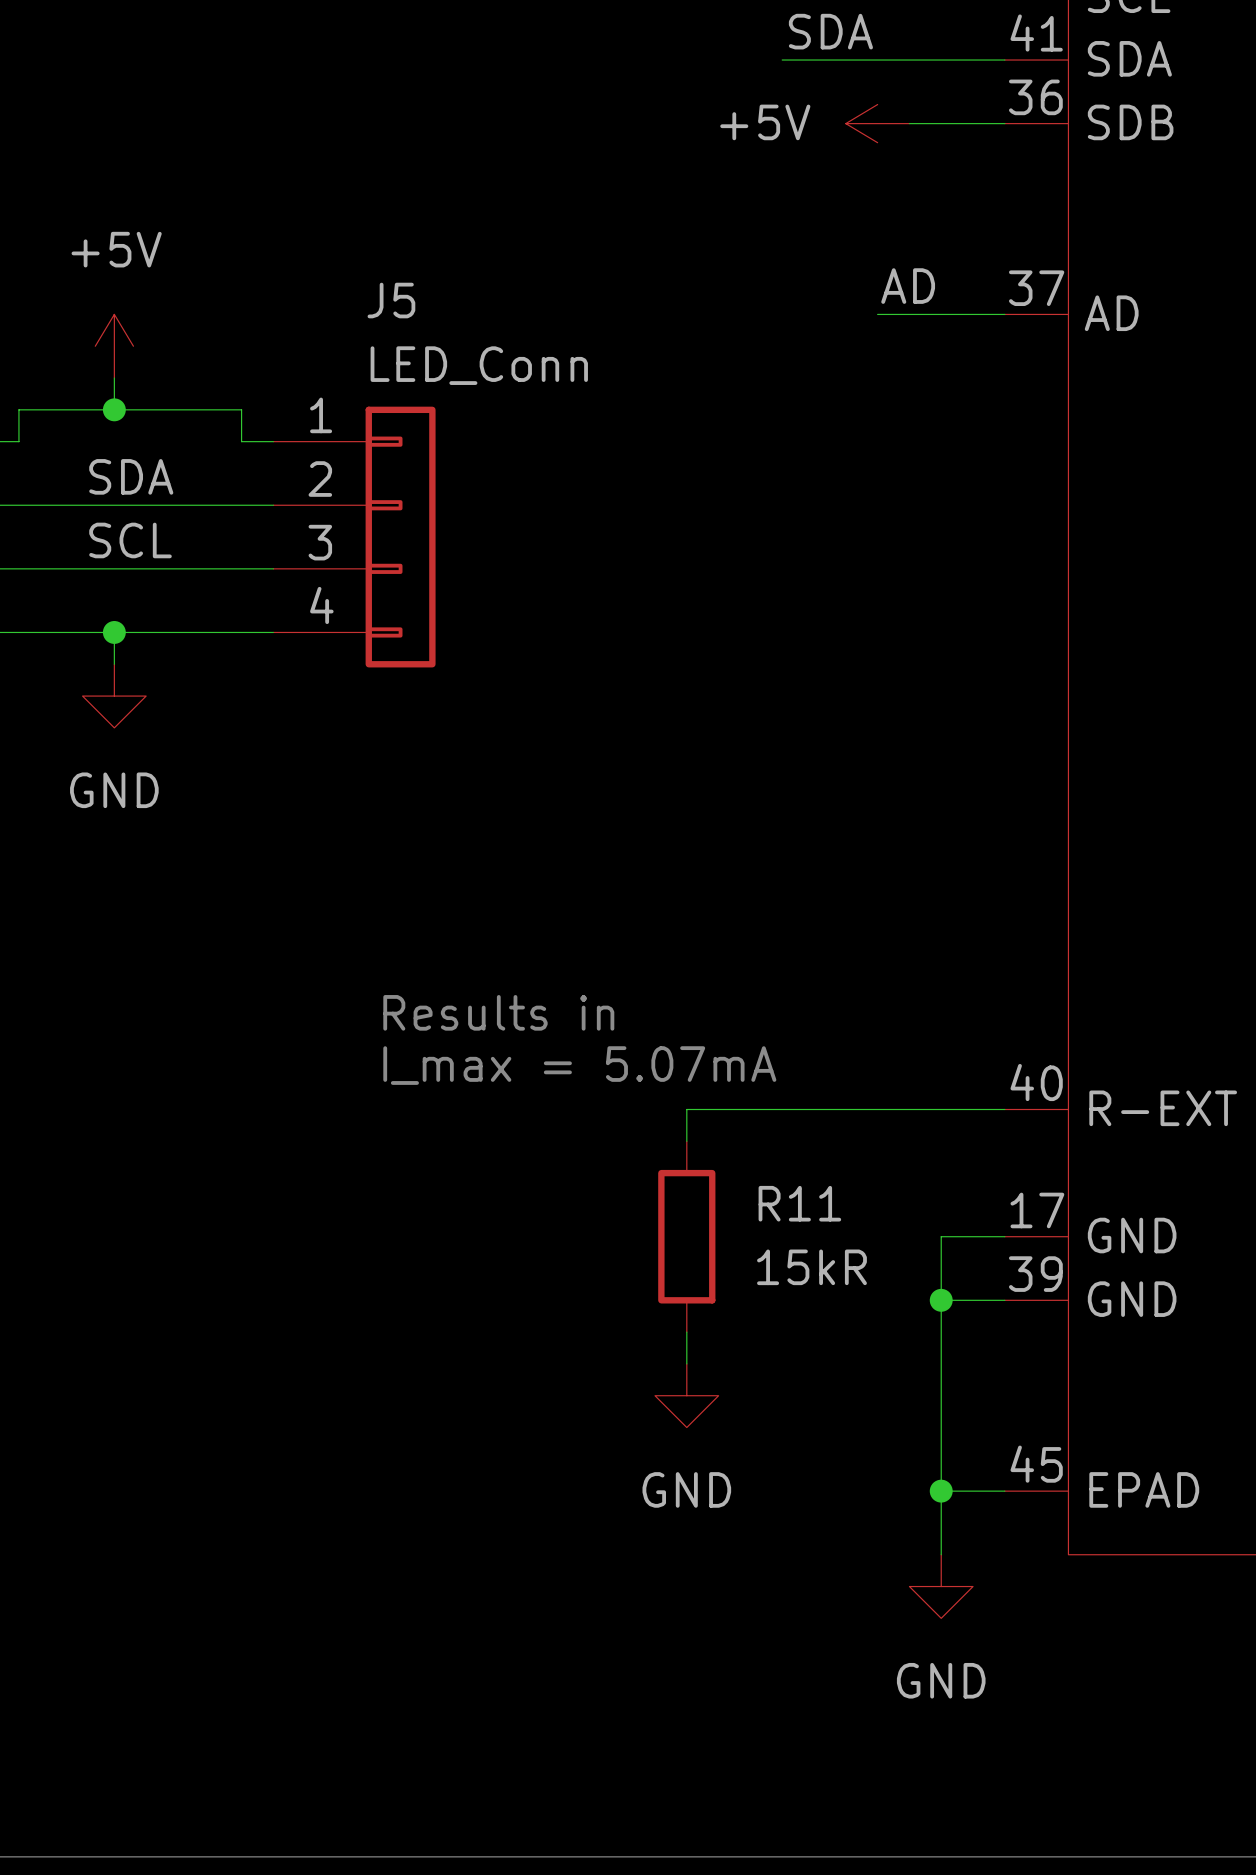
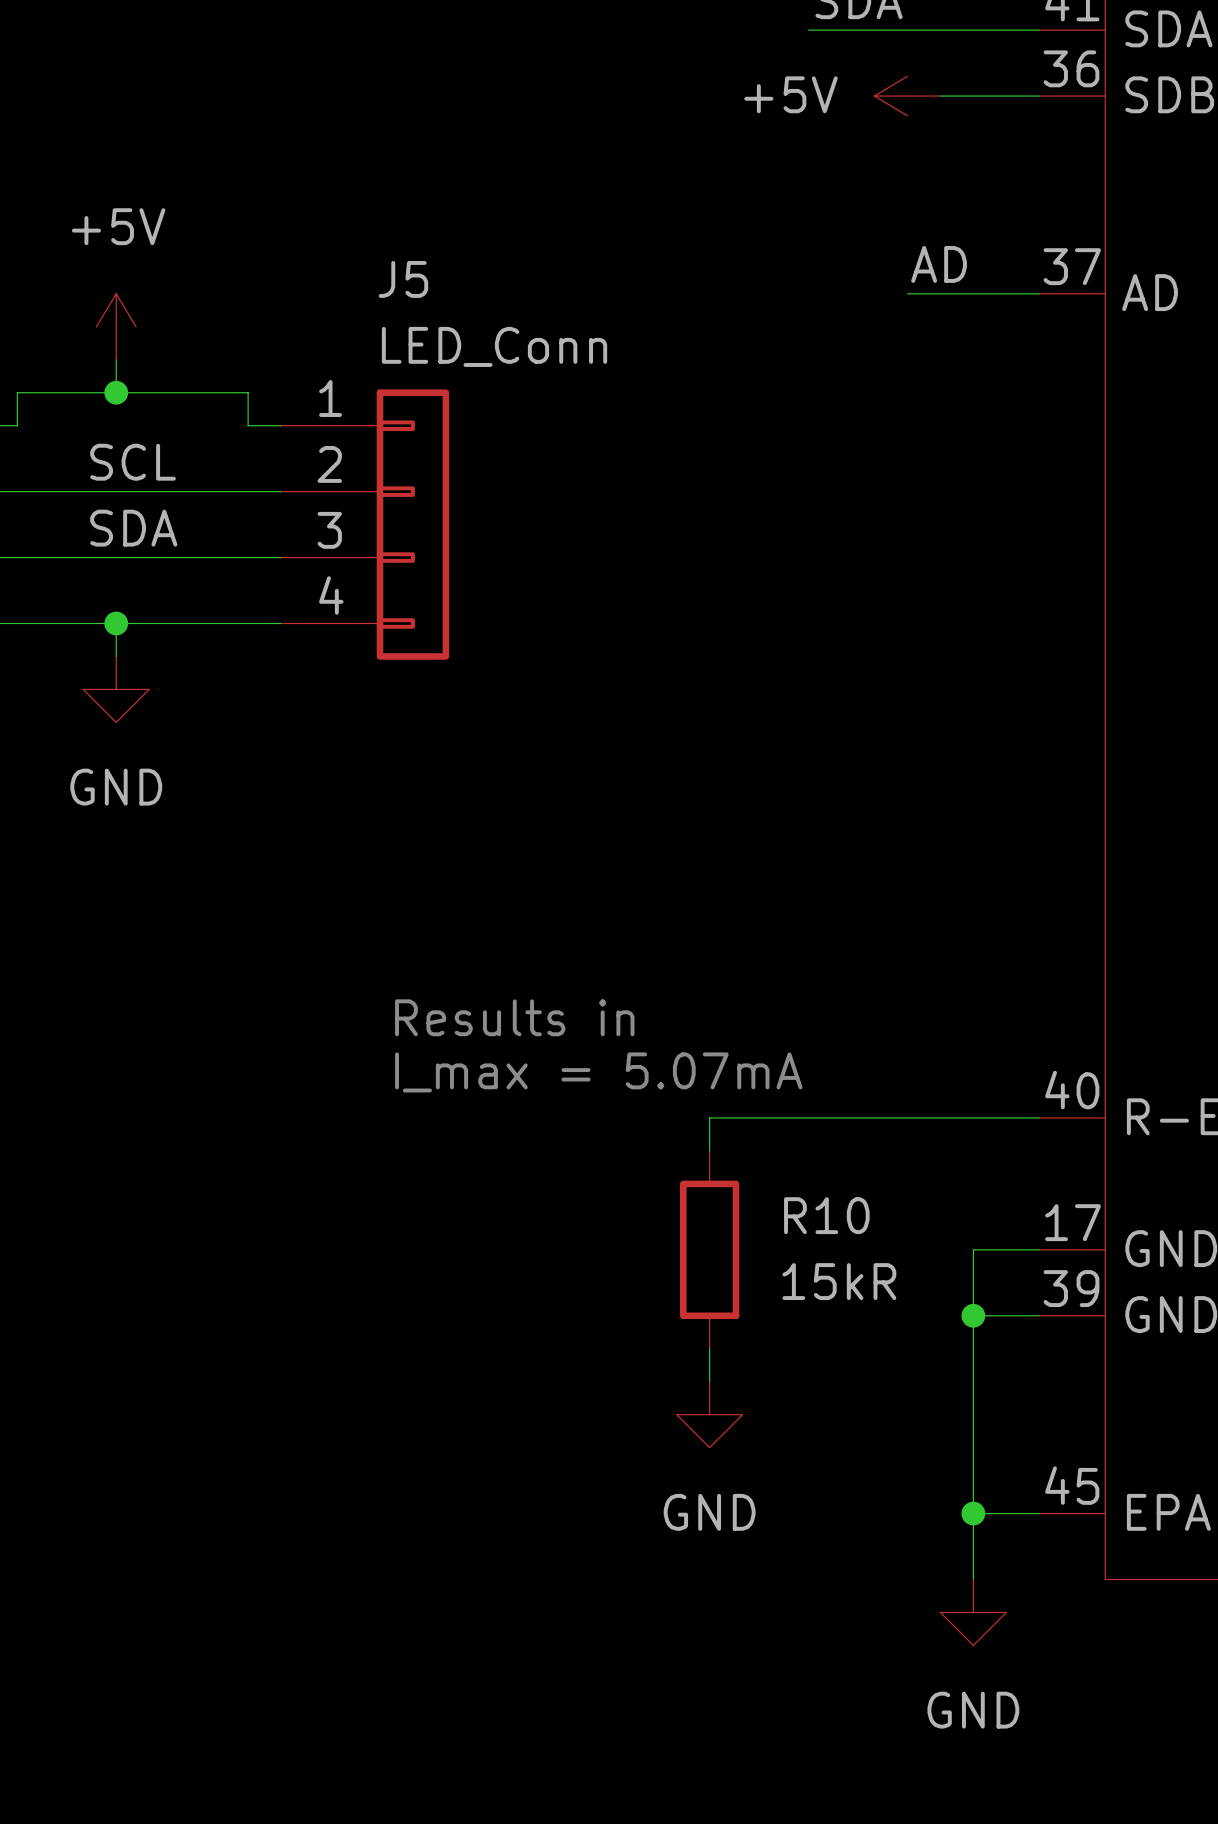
label: SDA (131, 476) -> SCL (132, 462)
label: SCL (130, 540) -> SDA (133, 528)
R11 name: R11 (799, 1203) -> R10 (826, 1215)

